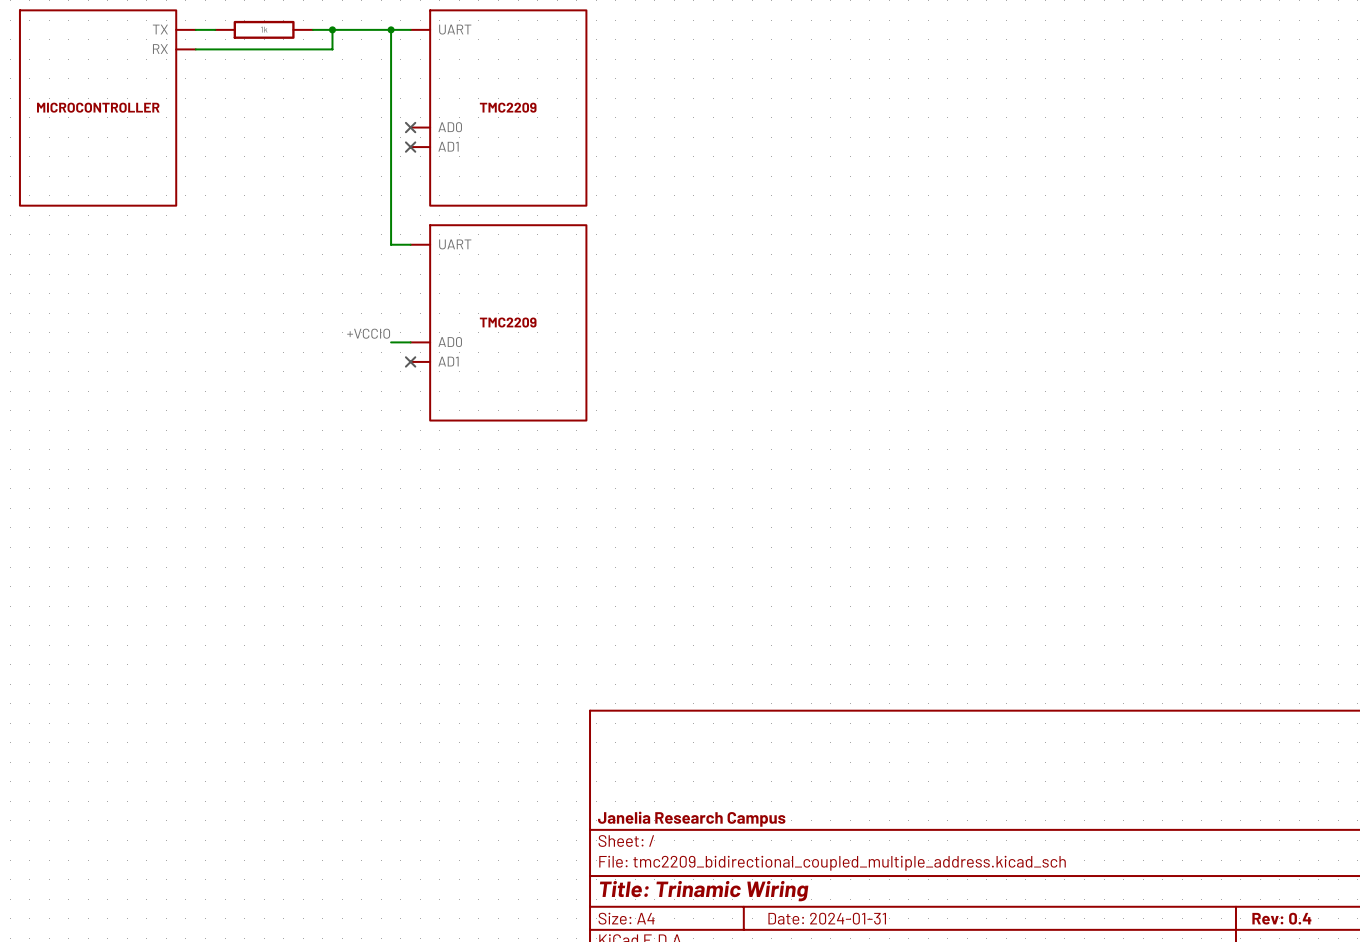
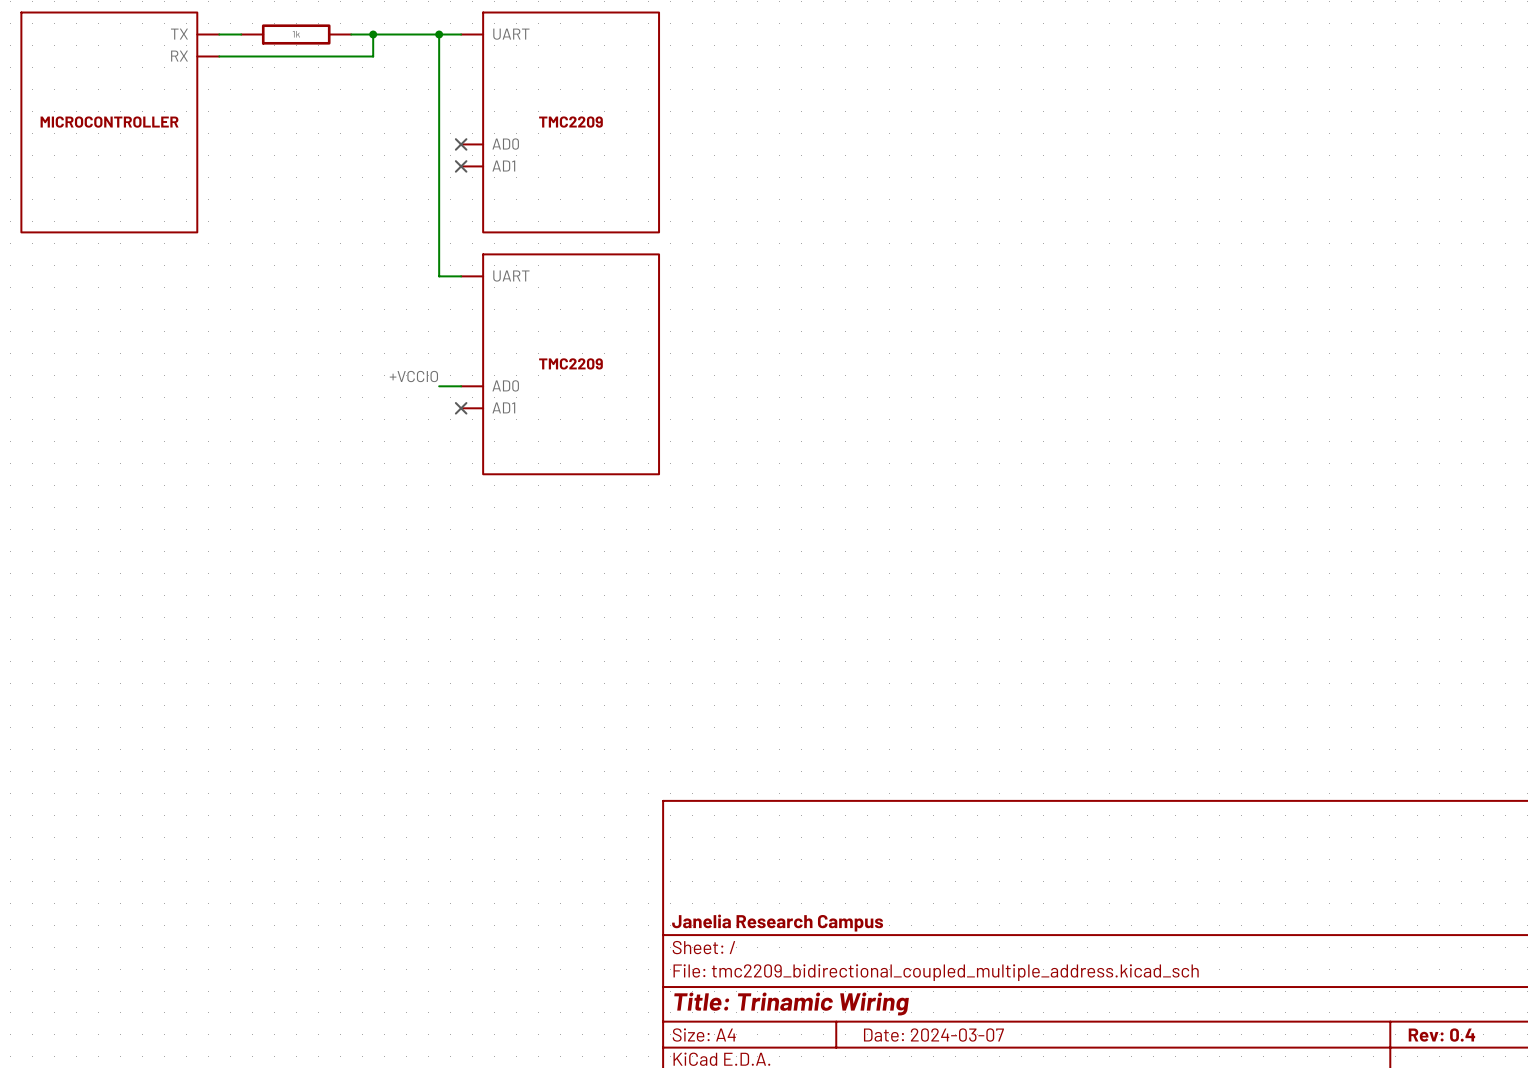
title block: Date: 2024-01-31 (827, 918) -> Date: 2024-03-07 (933, 1035)

